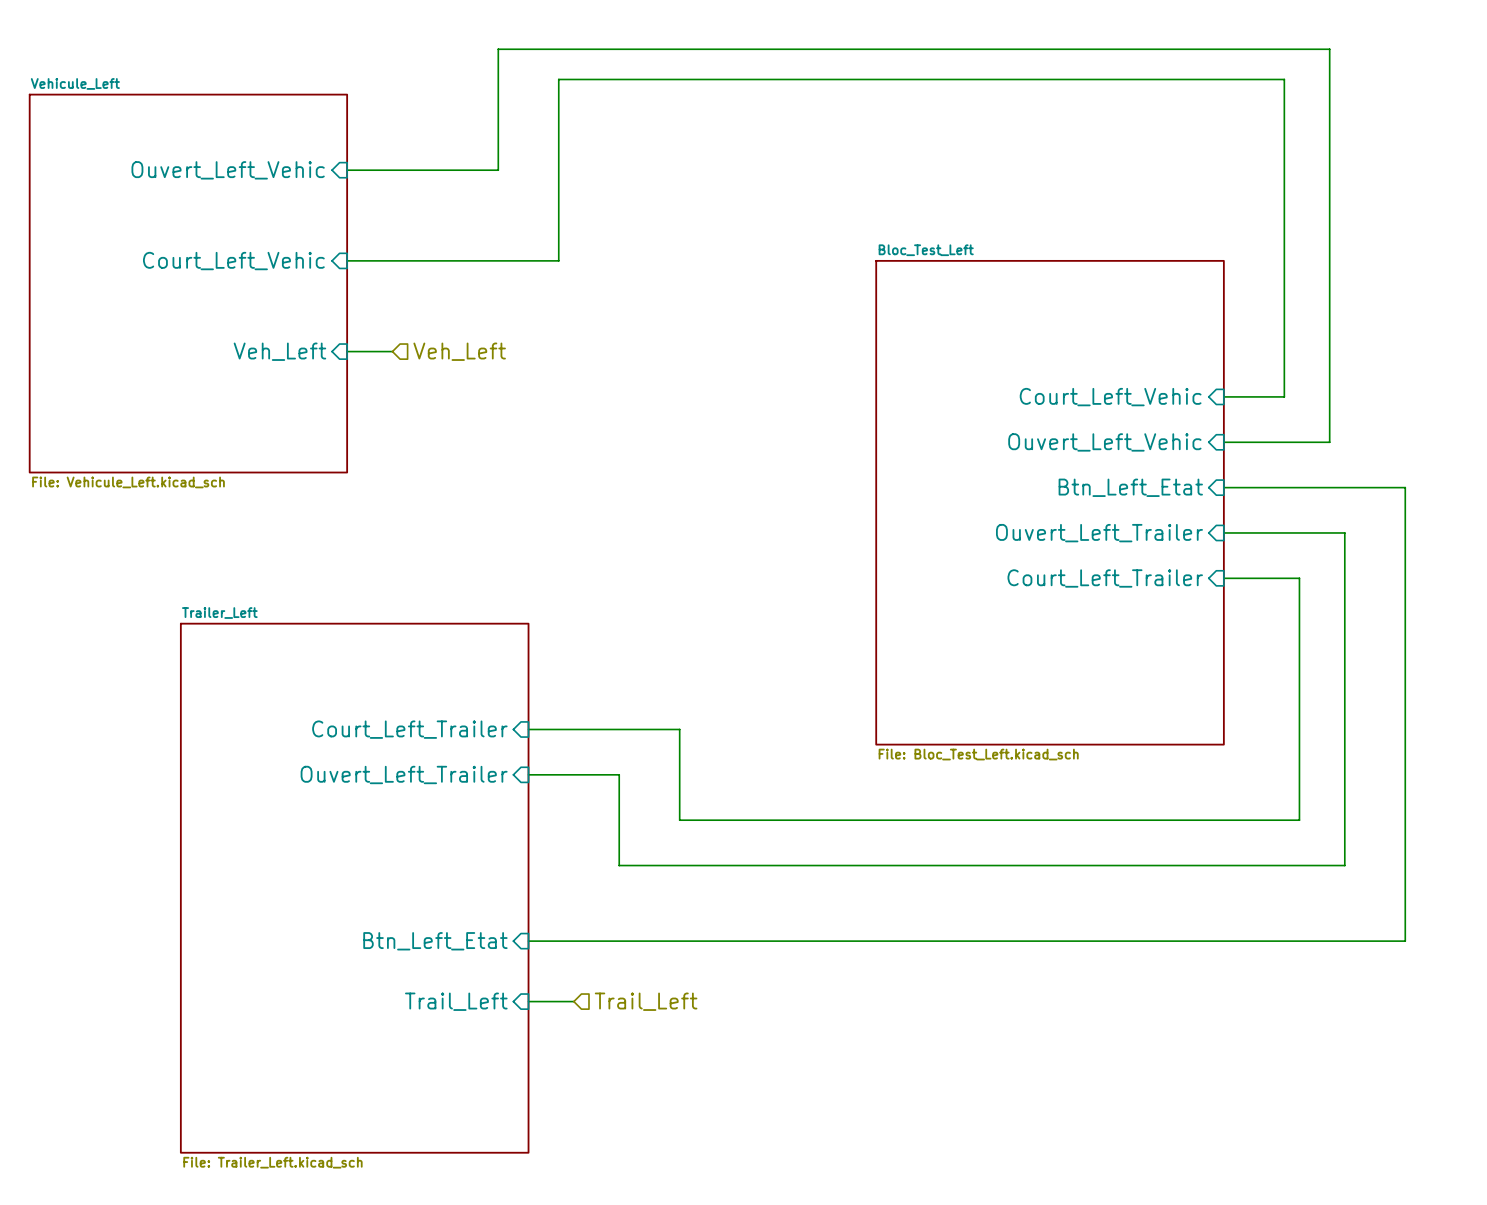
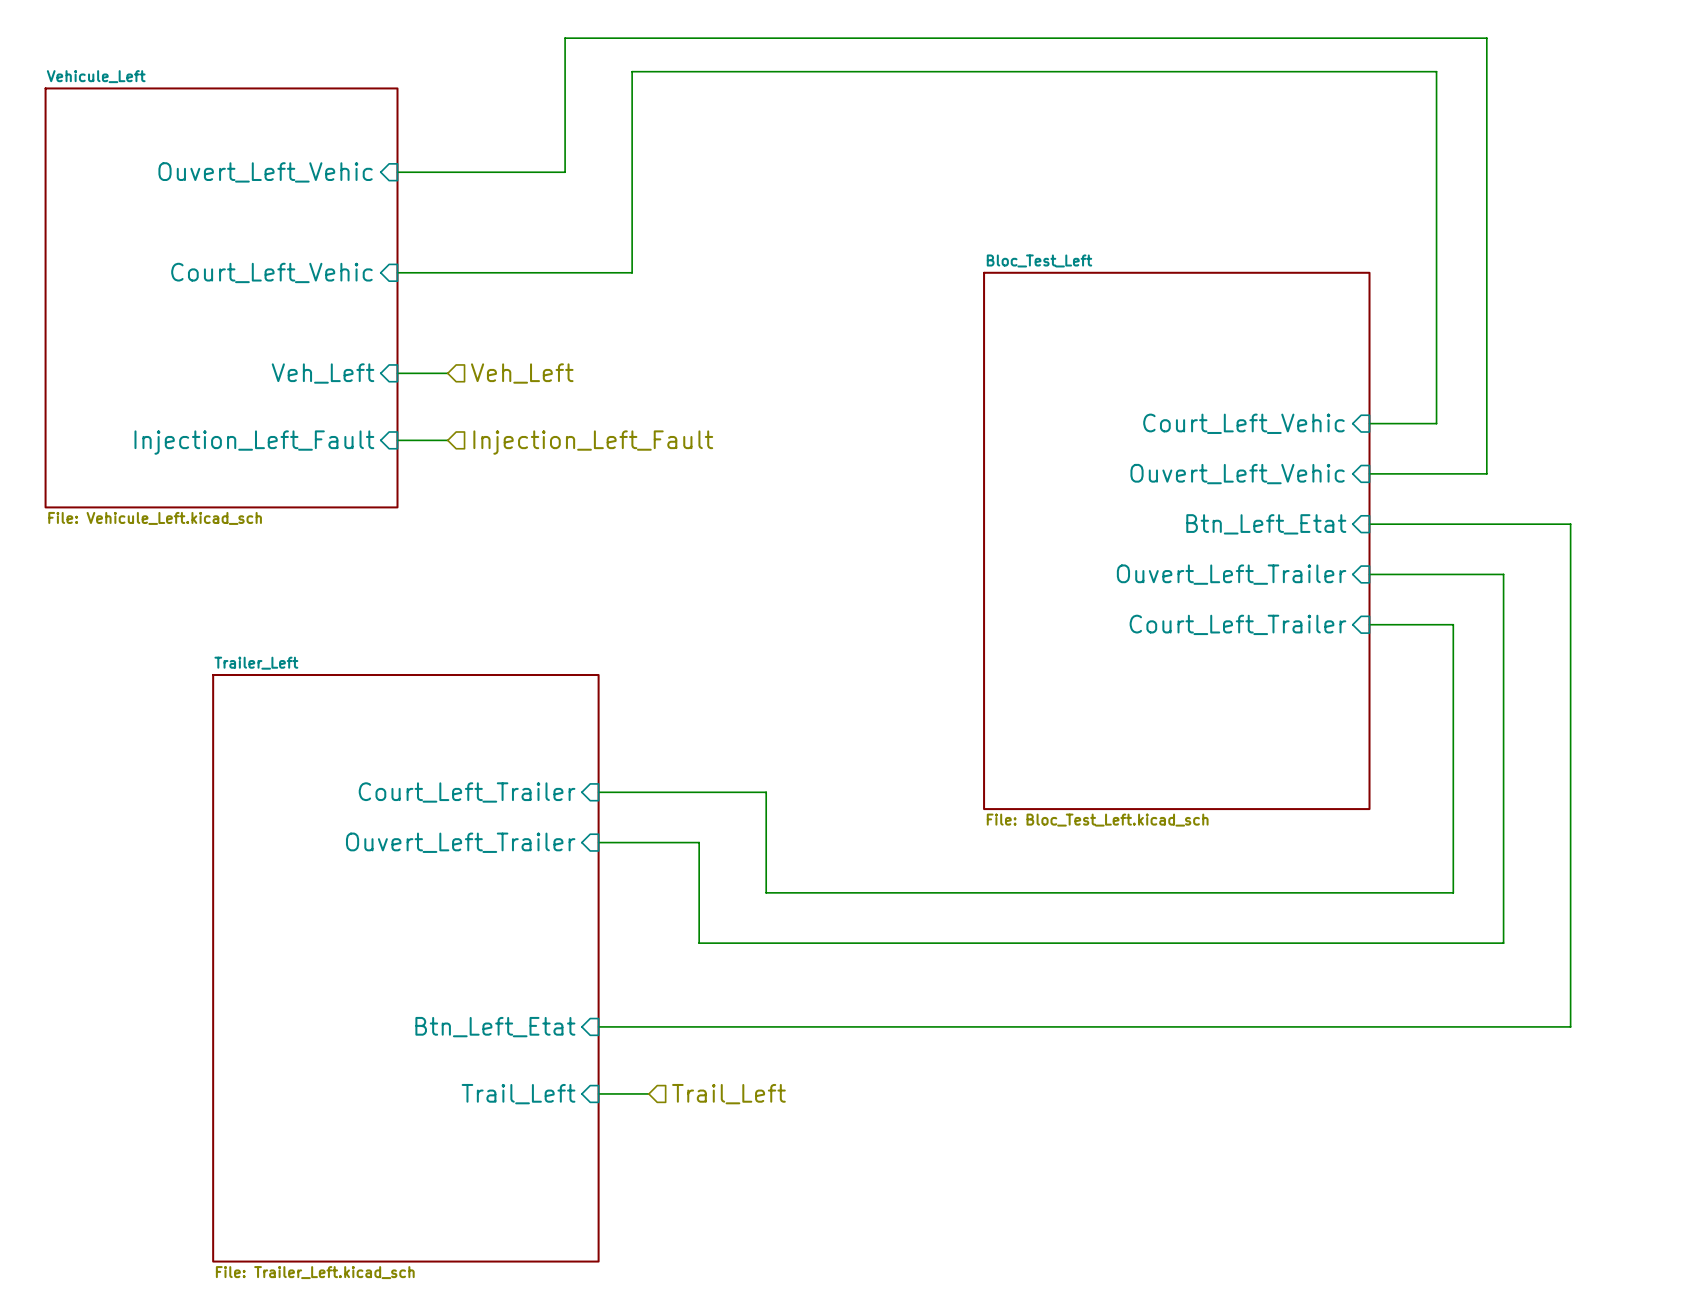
wire: none -> (397, 440) (447, 440)
sheet pin: none -> Injection_Left_Fault (254, 442)
hierarchical label: none -> Injection_Left_Fault (593, 442)

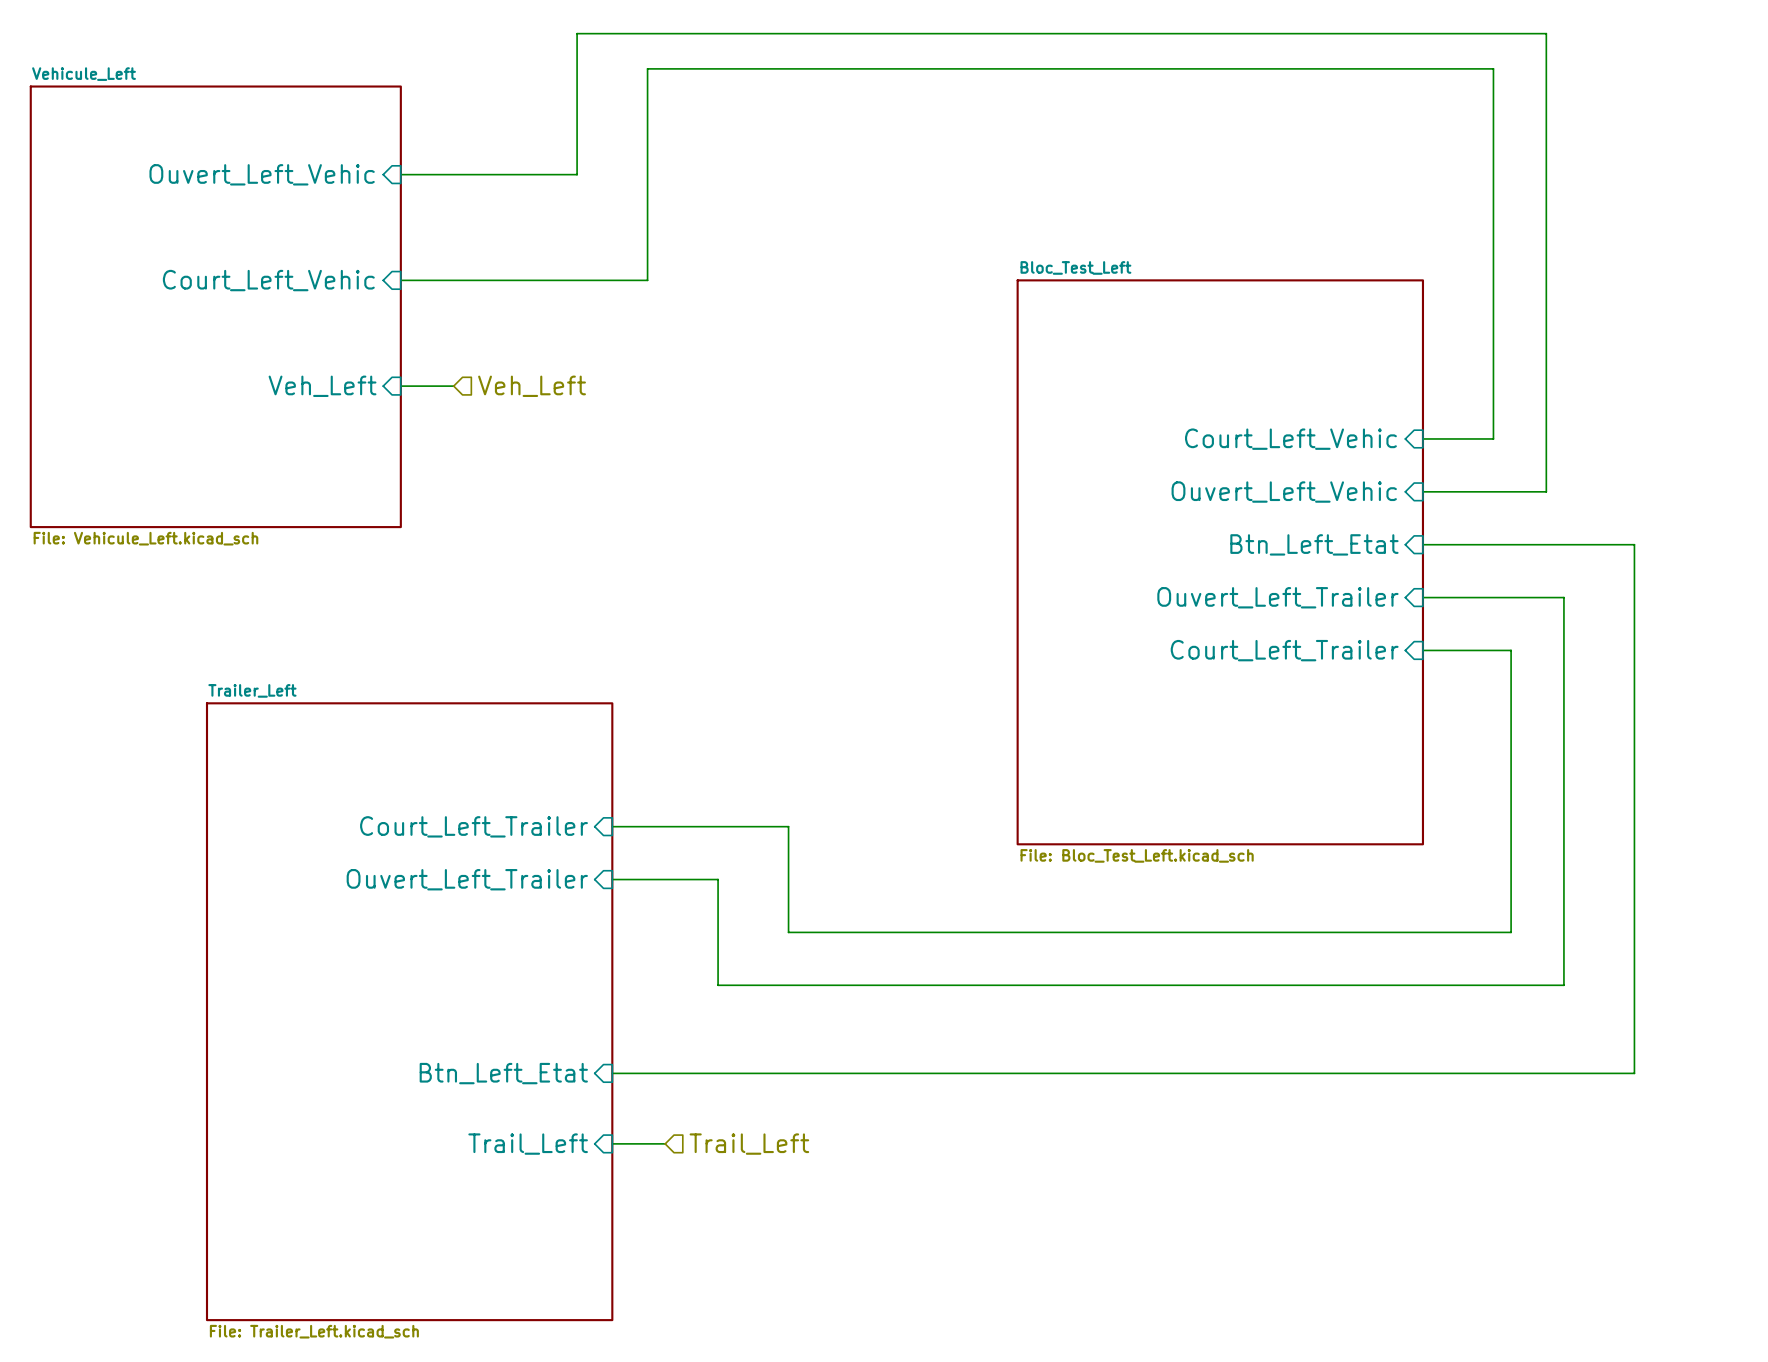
wire: (397, 440) (447, 440) -> none
sheet pin: Injection_Left_Fault (254, 442) -> none
hierarchical label: Injection_Left_Fault (593, 442) -> none

